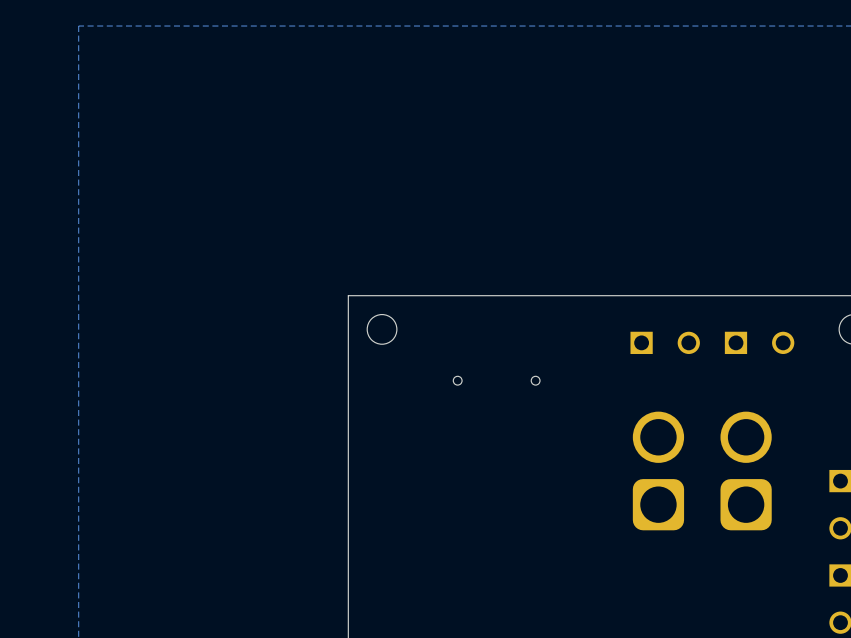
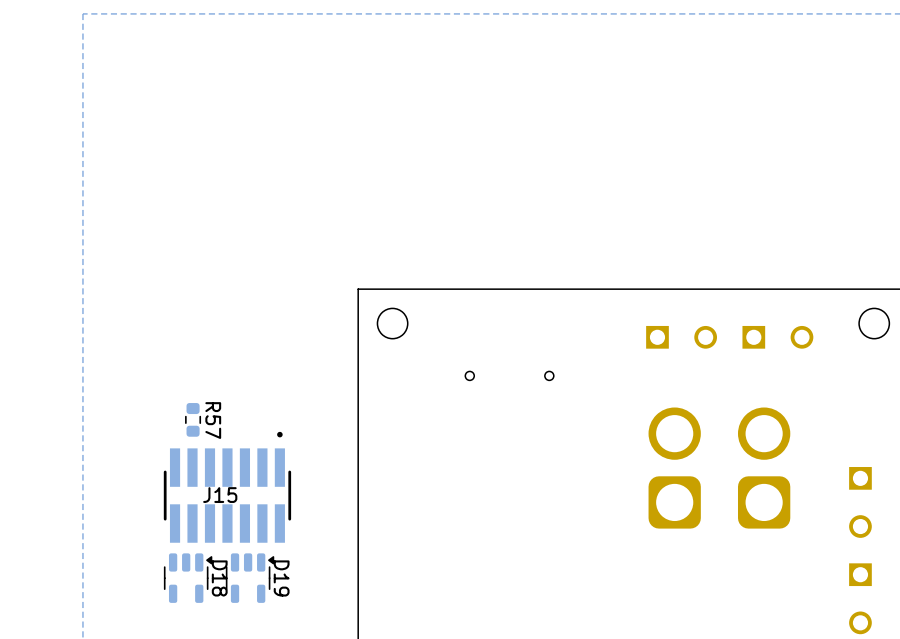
R57: none -> (193, 419)
J15: none -> (227, 487)
D18: none -> (188, 578)
D19: none -> (250, 578)

